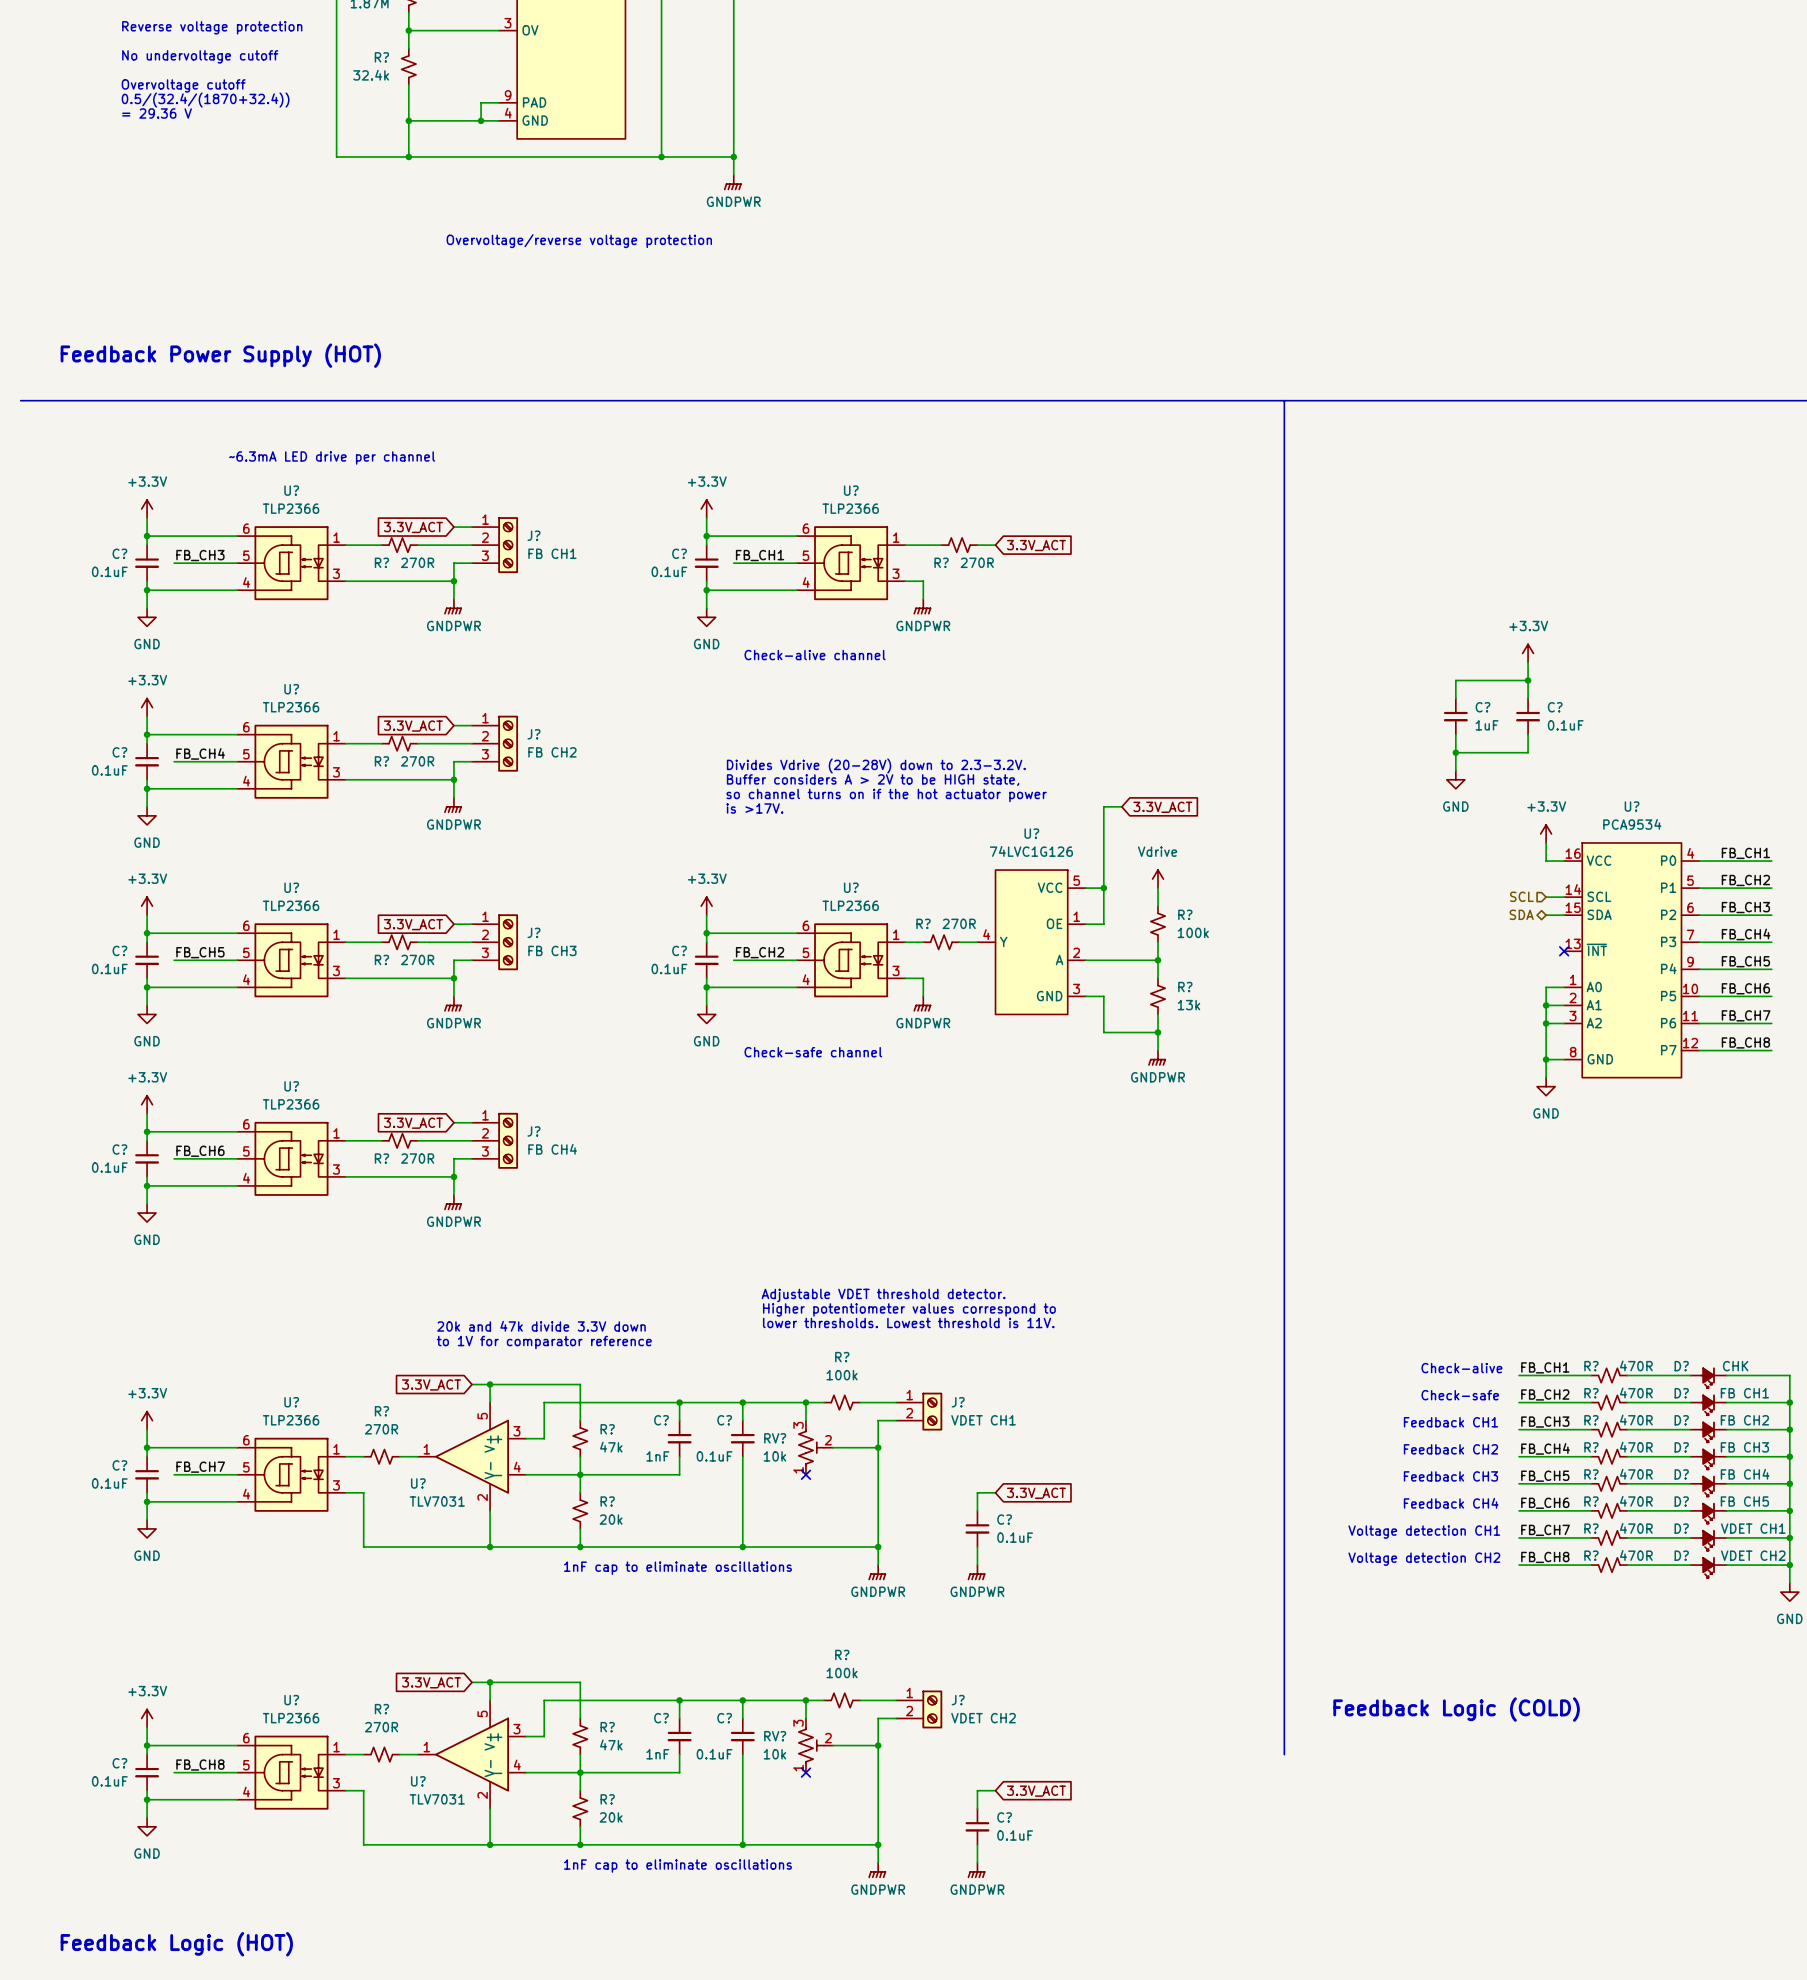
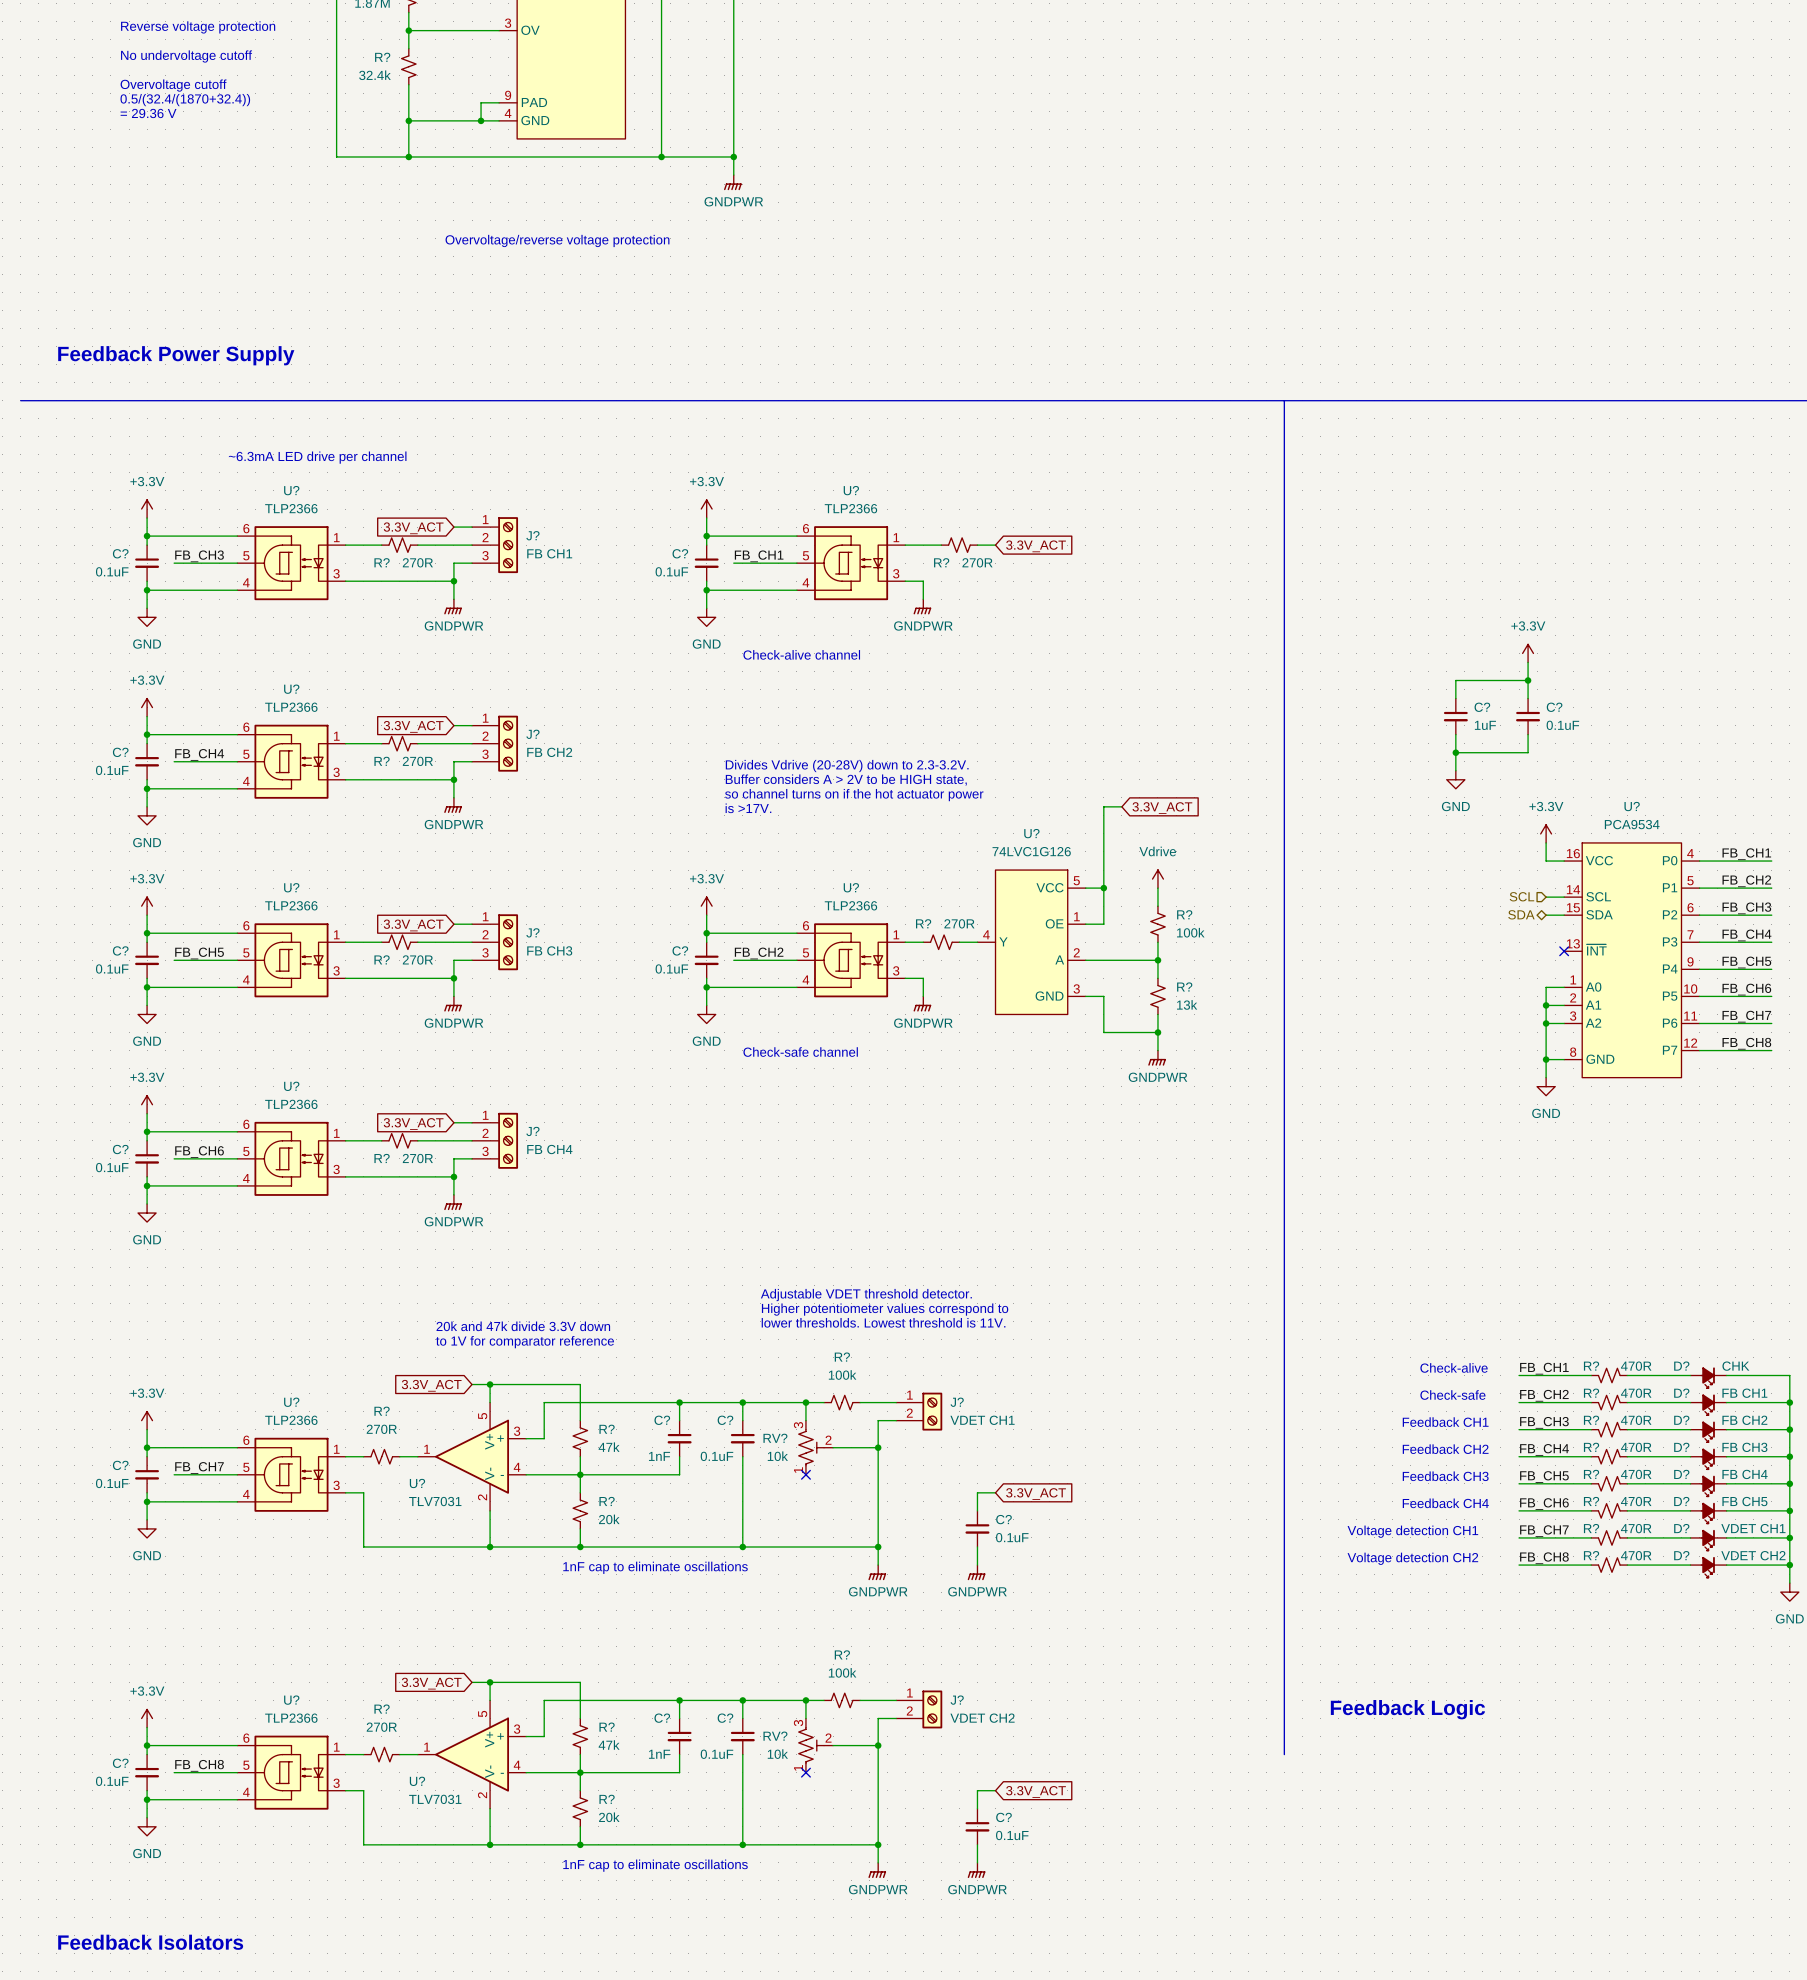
text: Feedback Power Supply (HOT) (220, 355) -> Feedback Power Supply (176, 355)
text: Feedback Logic (COLD) (1456, 1709) -> Feedback Logic (1407, 1709)
text: Feedback Logic (HOT) (176, 1944) -> Feedback Isolators (150, 1942)

